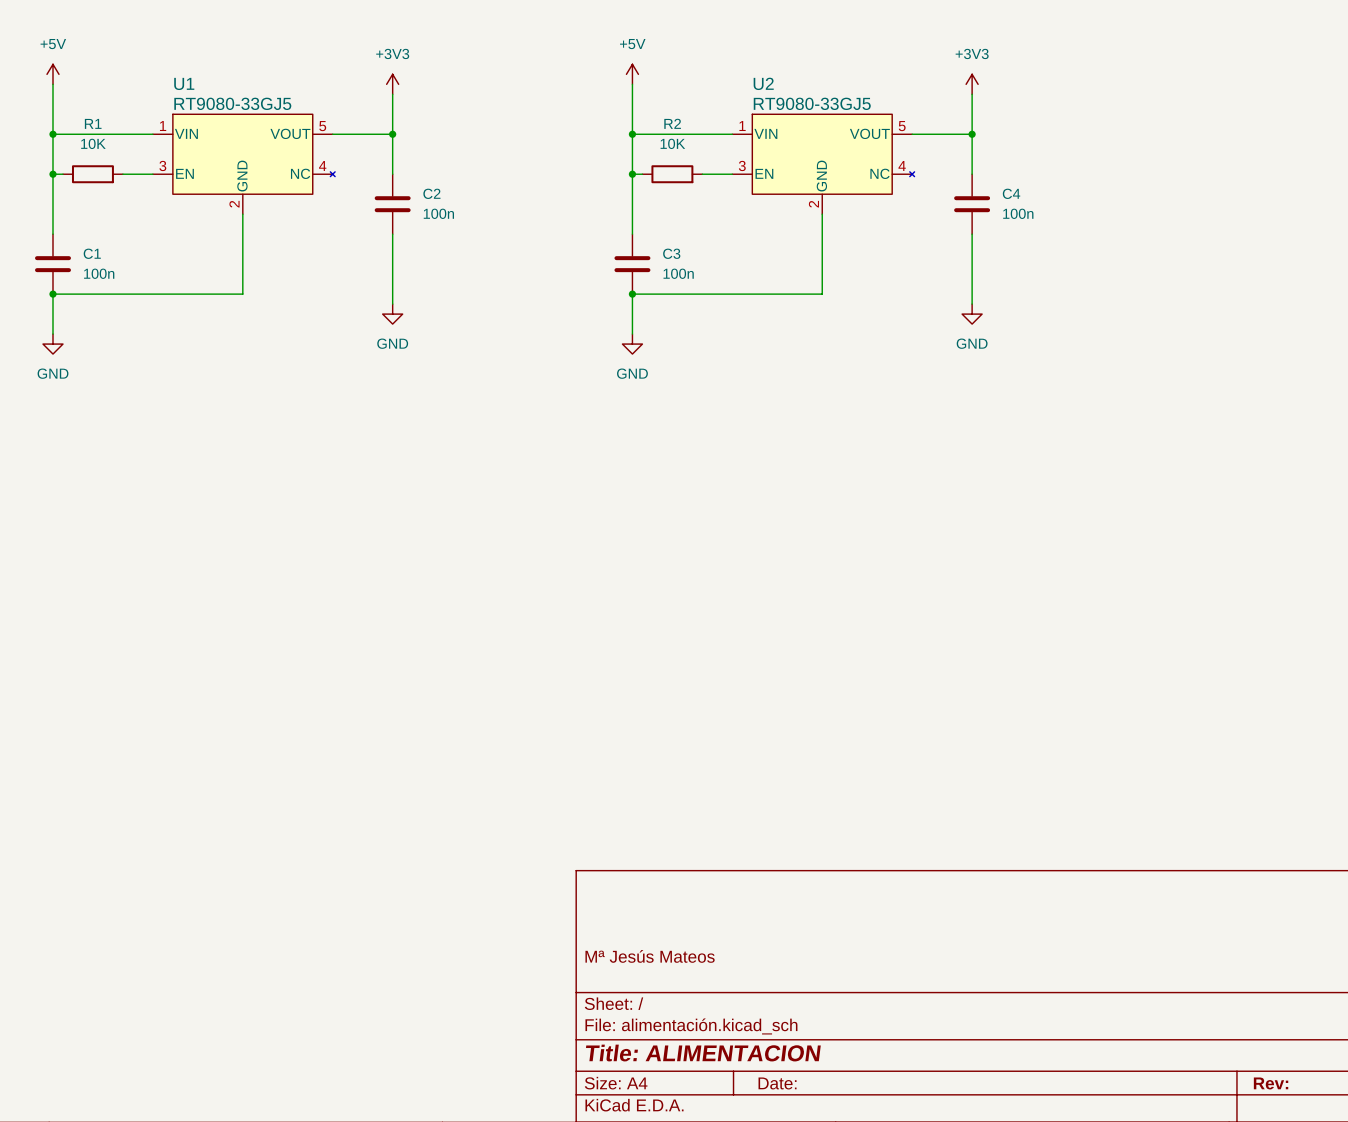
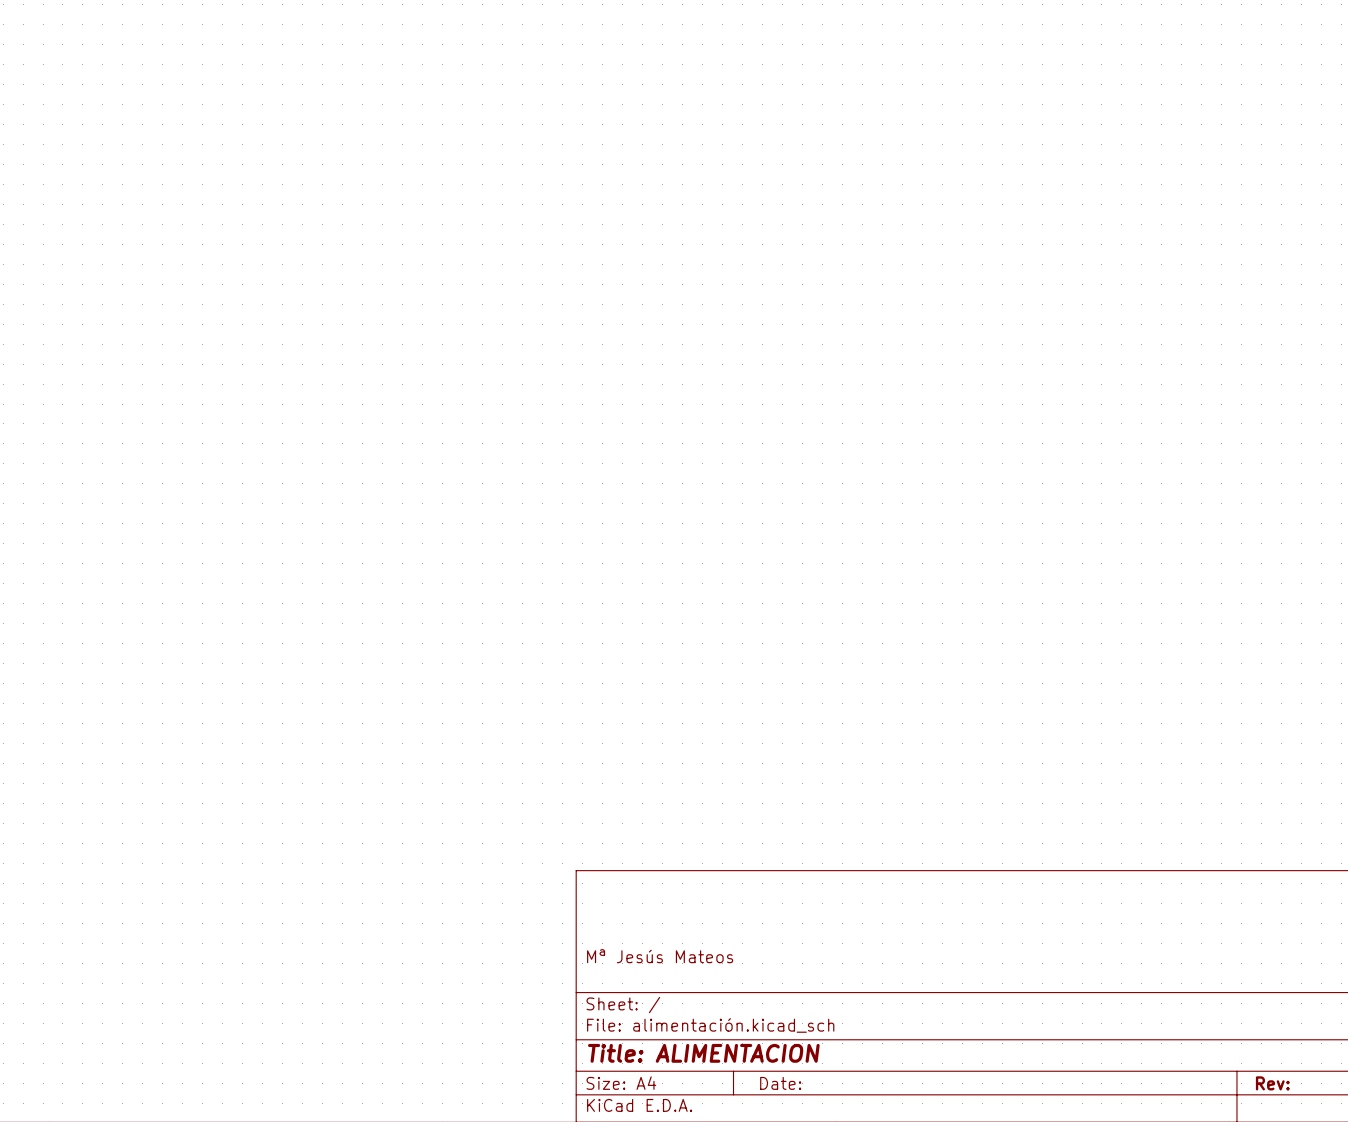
power symbol: +5V (52, 74) -> none
power symbol: +5V (632, 74) -> none
wire: (52, 84) (52, 234) -> none
power symbol: +3V3 (392, 84) -> none
wire: (632, 84) (632, 234) -> none
power symbol: +3V3 (972, 84) -> none
wire: (392, 94) (392, 174) -> none
wire: (972, 94) (972, 174) -> none
wire: (52, 134) (152, 134) -> none
junction: (52, 134) -> none
wire: (332, 134) (392, 134) -> none
junction: (392, 134) -> none
wire: (632, 134) (732, 134) -> none
junction: (632, 134) -> none
wire: (912, 134) (972, 134) -> none
junction: (972, 134) -> none
U1: RT9080-33GJ5 (243, 164) -> none
U2: RT9080-33GJ5 (823, 164) -> none
wire: (52, 174) (62, 174) -> none
junction: (52, 174) -> none
R1: 10K (92, 174) -> none
wire: (122, 174) (152, 174) -> none
wire: (632, 174) (642, 174) -> none
junction: (632, 174) -> none
R2: 10K (672, 174) -> none
wire: (702, 174) (732, 174) -> none
C2: 100n (392, 204) -> none
C4: 100n (972, 204) -> none
wire: (242, 214) (242, 294) (52, 294) (52, 334) -> none
wire: (822, 214) (822, 294) (632, 294) (632, 334) -> none
wire: (392, 234) (392, 304) -> none
wire: (972, 234) (972, 304) -> none
C1: 100n (52, 264) -> none
C3: 100n (632, 264) -> none
junction: (52, 294) -> none
junction: (632, 294) -> none
power symbol: GND (392, 314) -> none
power symbol: GND (972, 314) -> none
power symbol: GND (52, 344) -> none
power symbol: GND (632, 344) -> none

